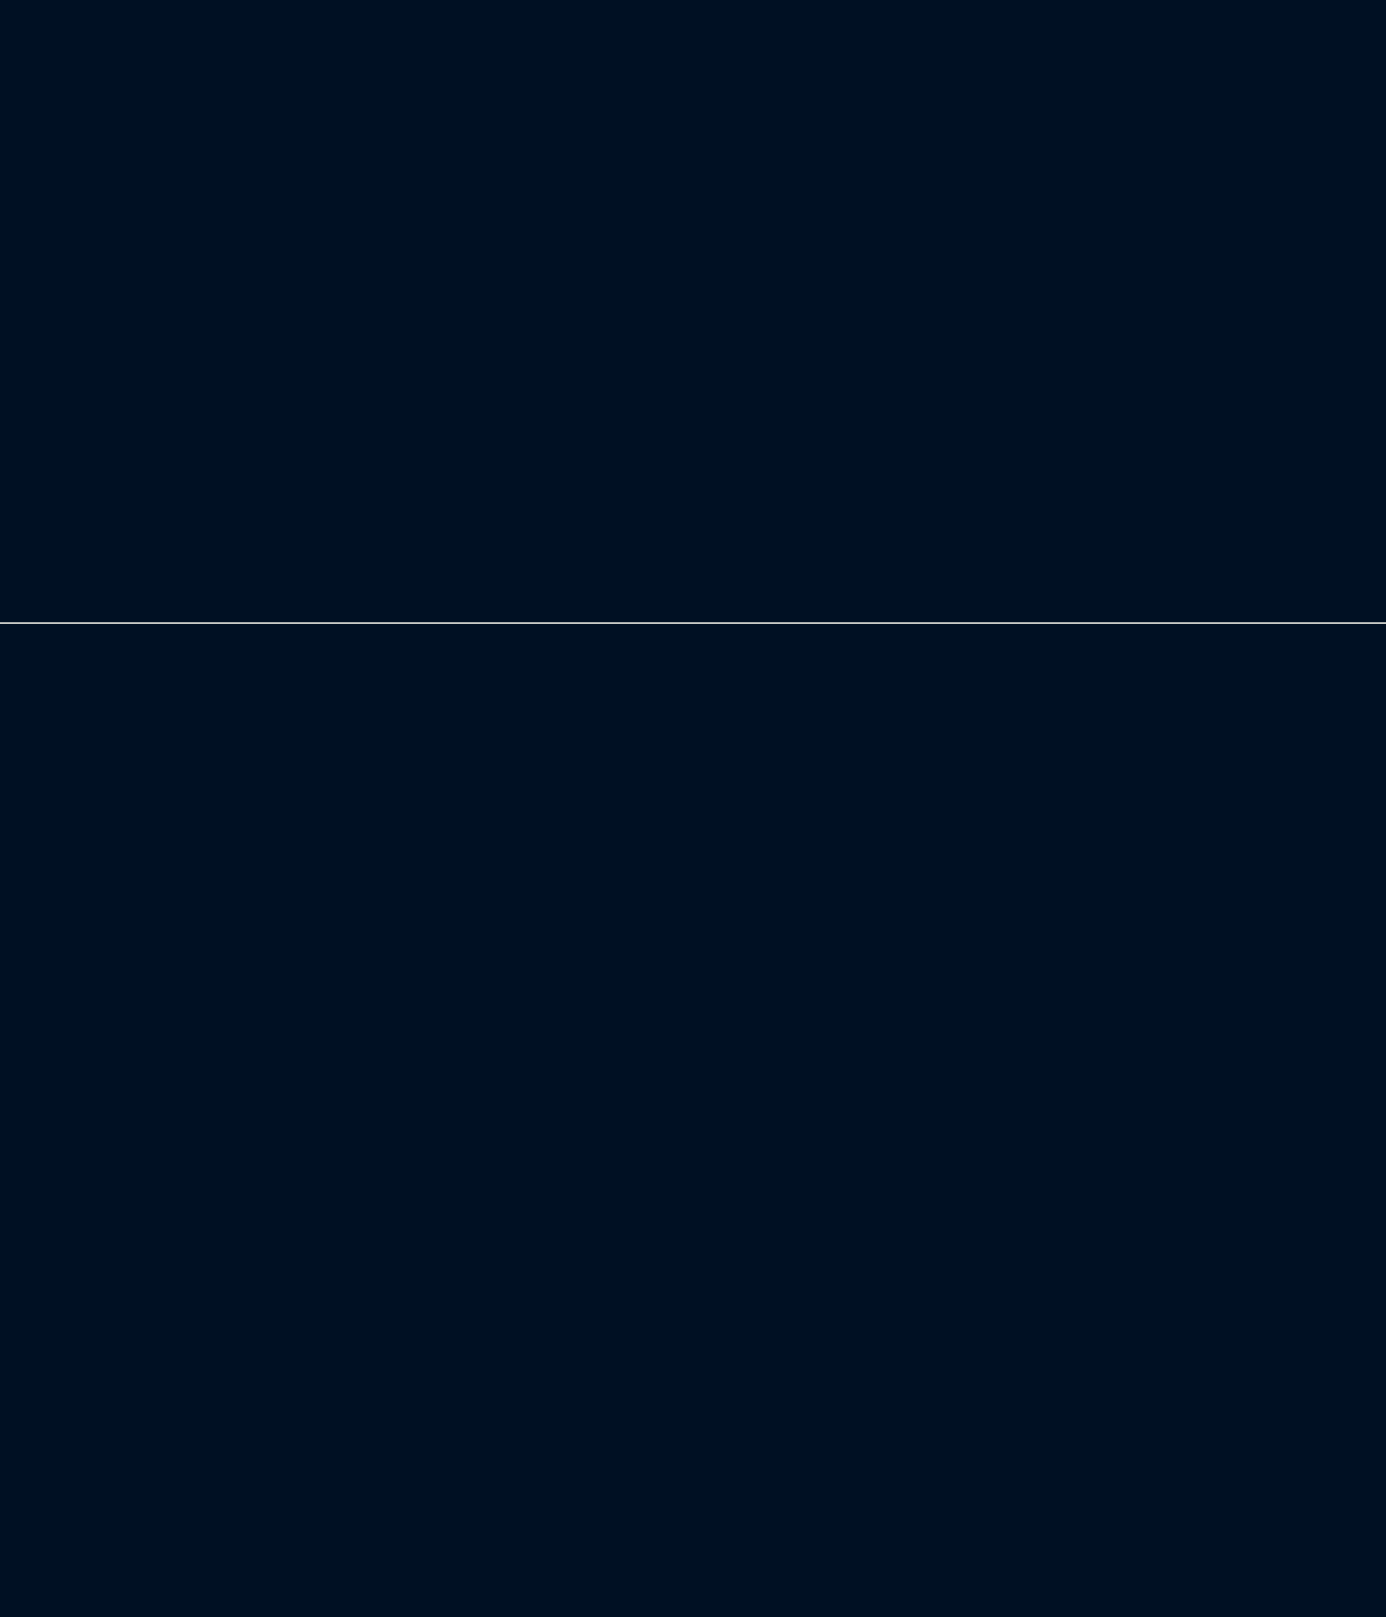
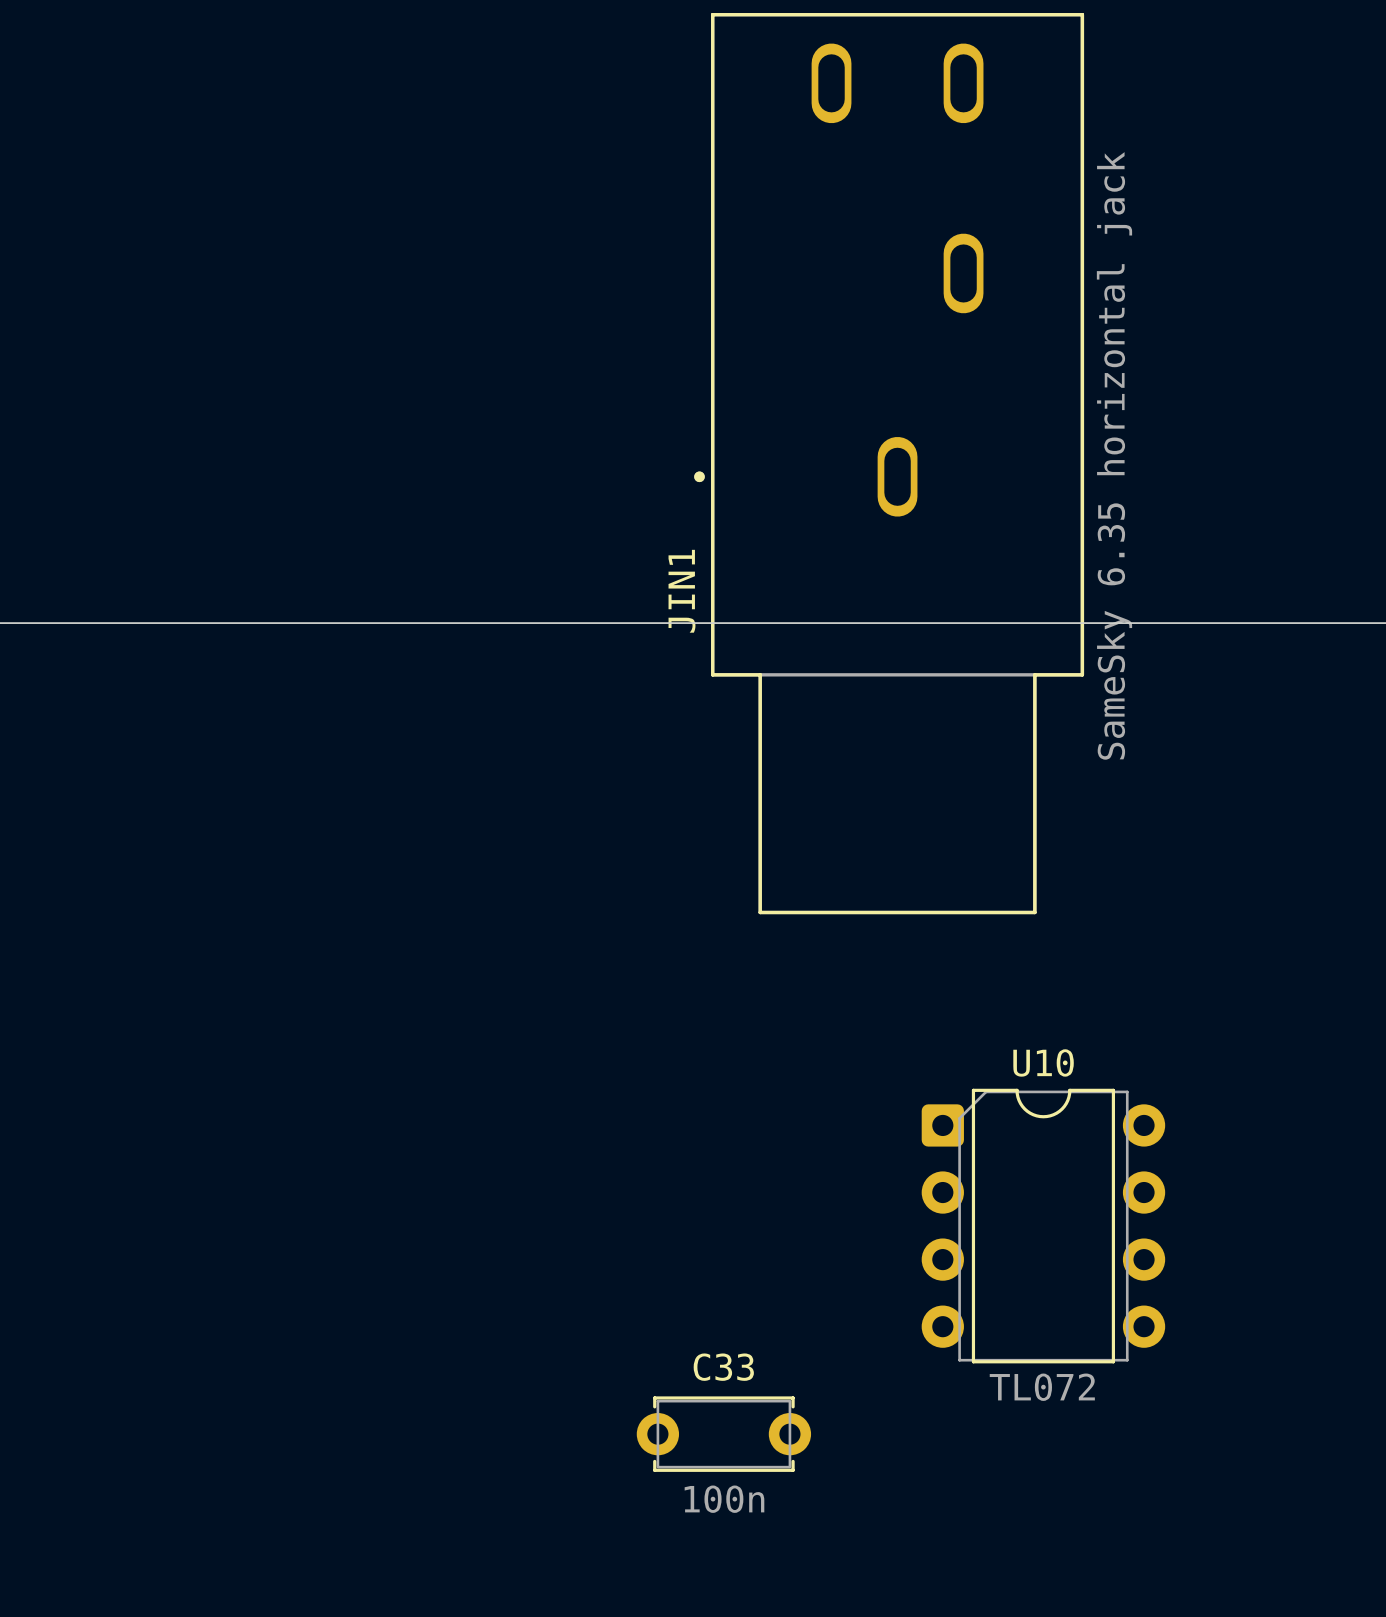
JIN1: none -> SameSky 6.35 horizontal jack (889, 463)
U10: none -> TL072 (1043, 1226)
C33: none -> 100n (723, 1434)

